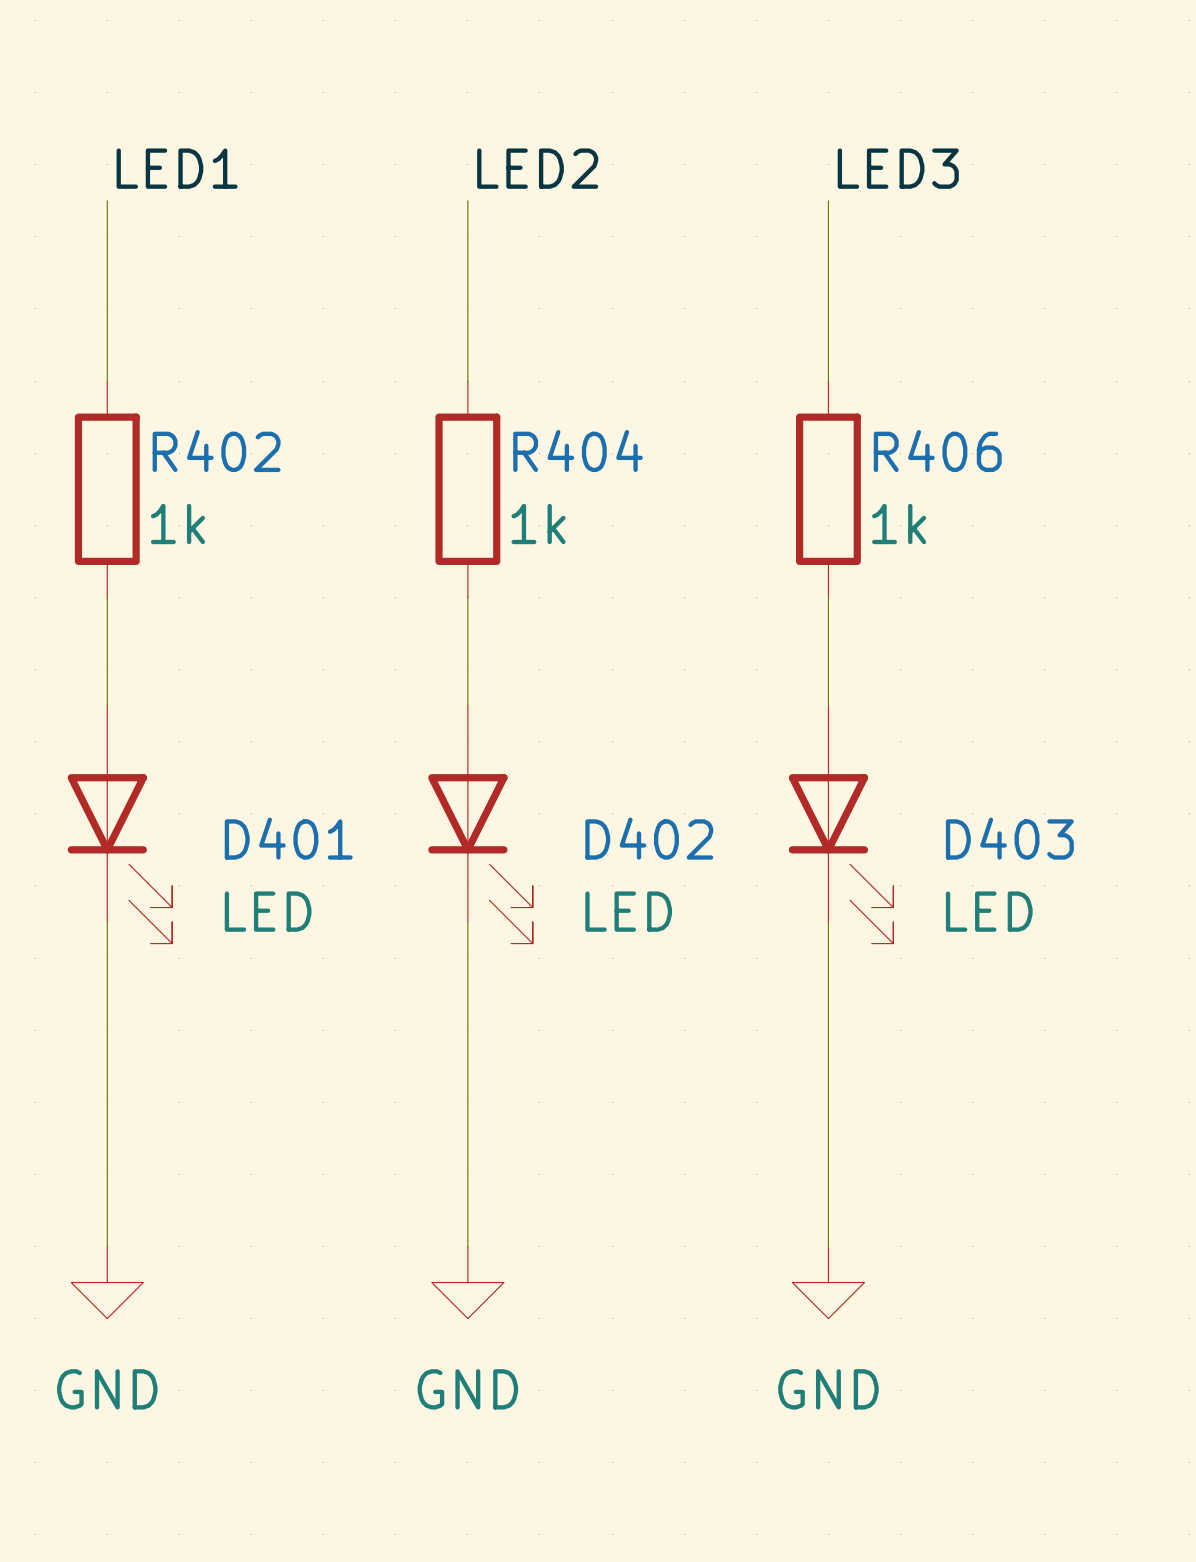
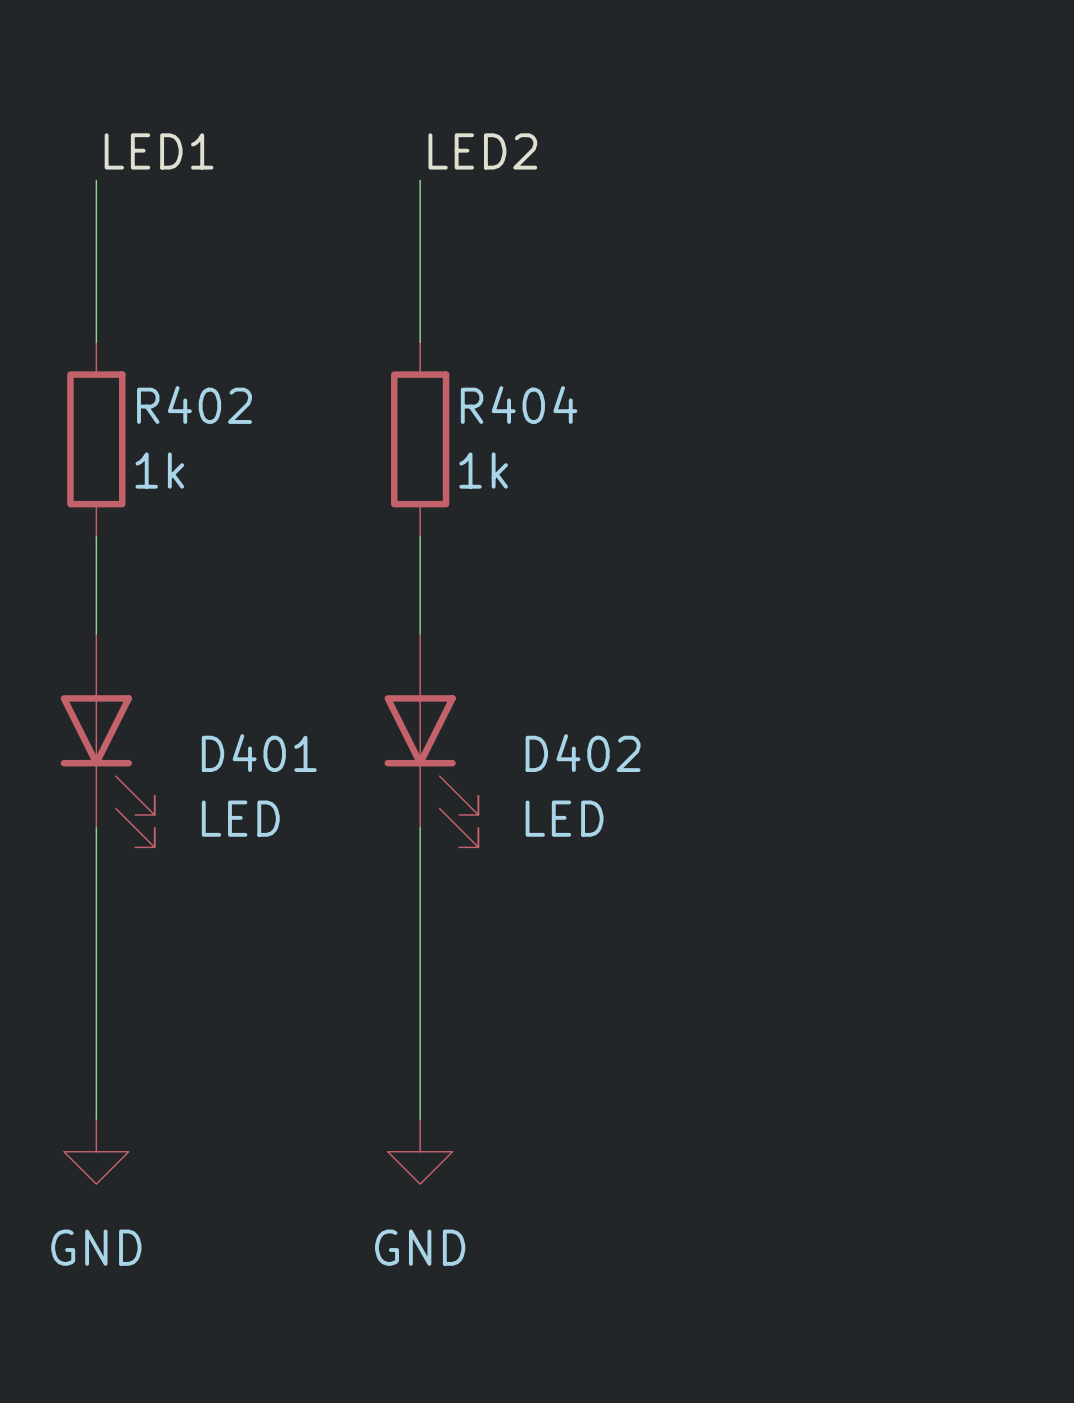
label: LED3 (898, 168) -> none
wire: (828, 200) (828, 381) -> none
R406: 1k (828, 489) -> none
wire: (828, 597) (828, 705) -> none
D403: LED (841, 824) -> none
wire: (828, 921) (828, 1246) -> none
power symbol: GND (828, 1282) -> none

